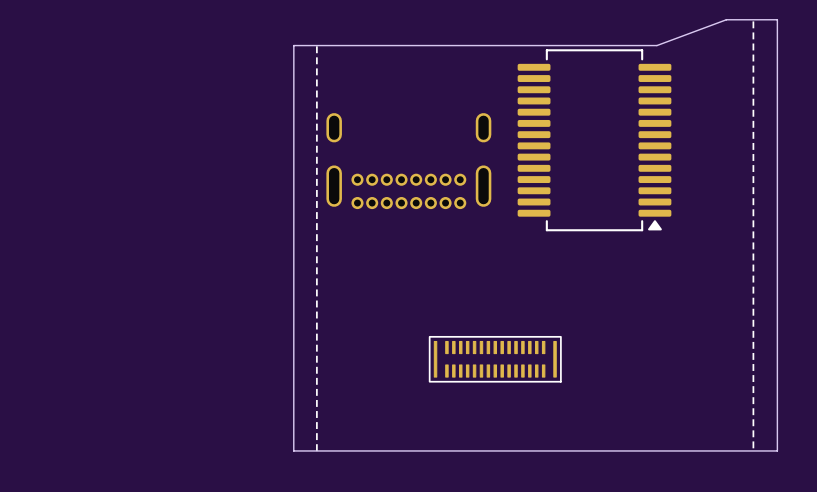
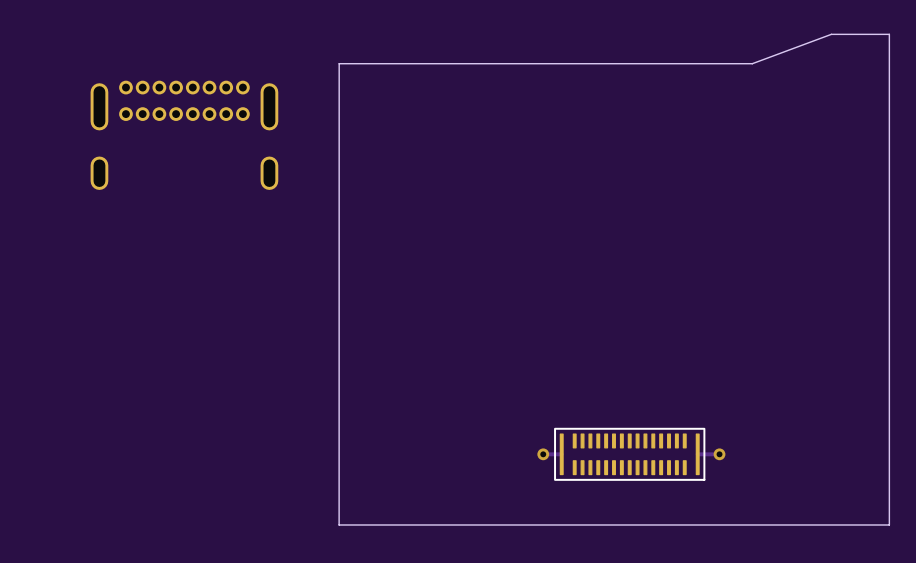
line: (753, 21) (753, 451) -> none
line: (316, 46) (316, 451) -> none
part: (594, 140) -> none
part rotation: 0° (408, 161) -> 180° (184, 135)
part position: (408, 161) -> (184, 135)
part position: (495, 359) -> (629, 454)
via: none -> (543, 454)
track: none -> (561, 454) (543, 454)
track: none -> (719, 454) (697, 454)
via: none -> (719, 454)

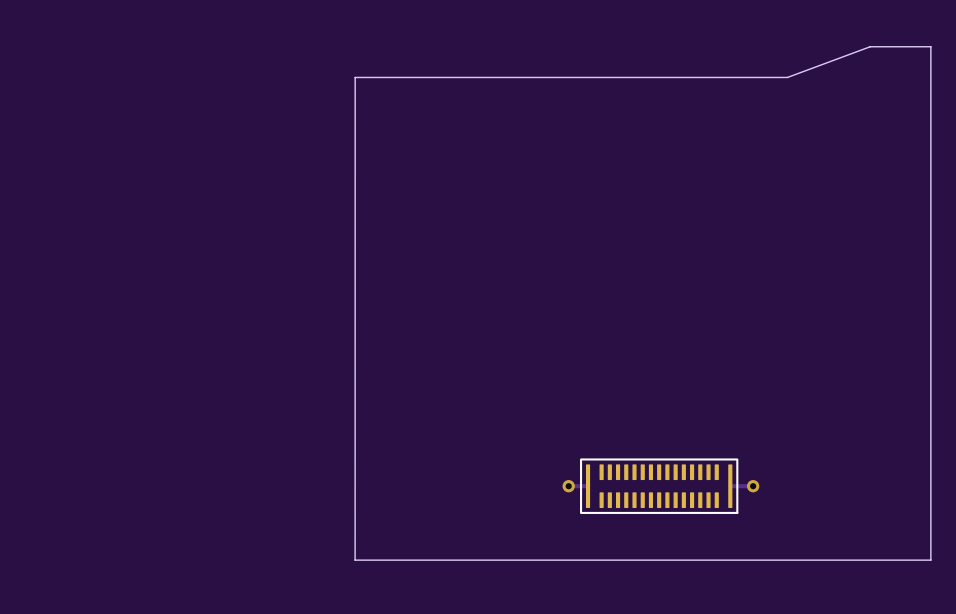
part: (184, 135) -> none

